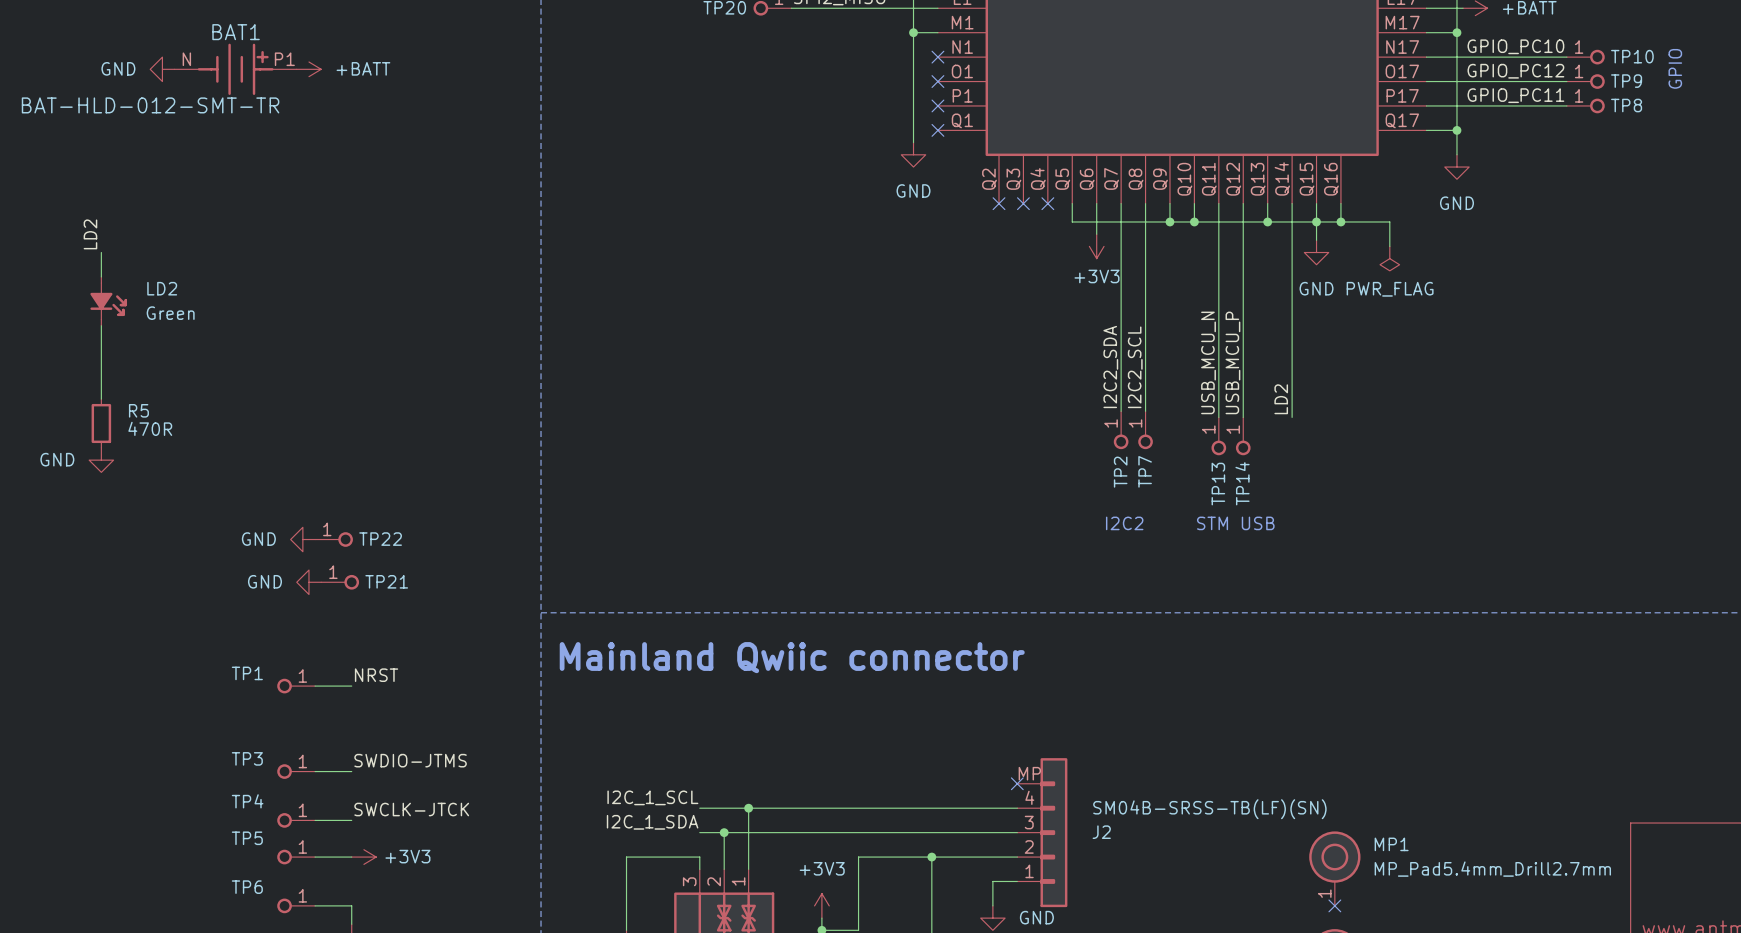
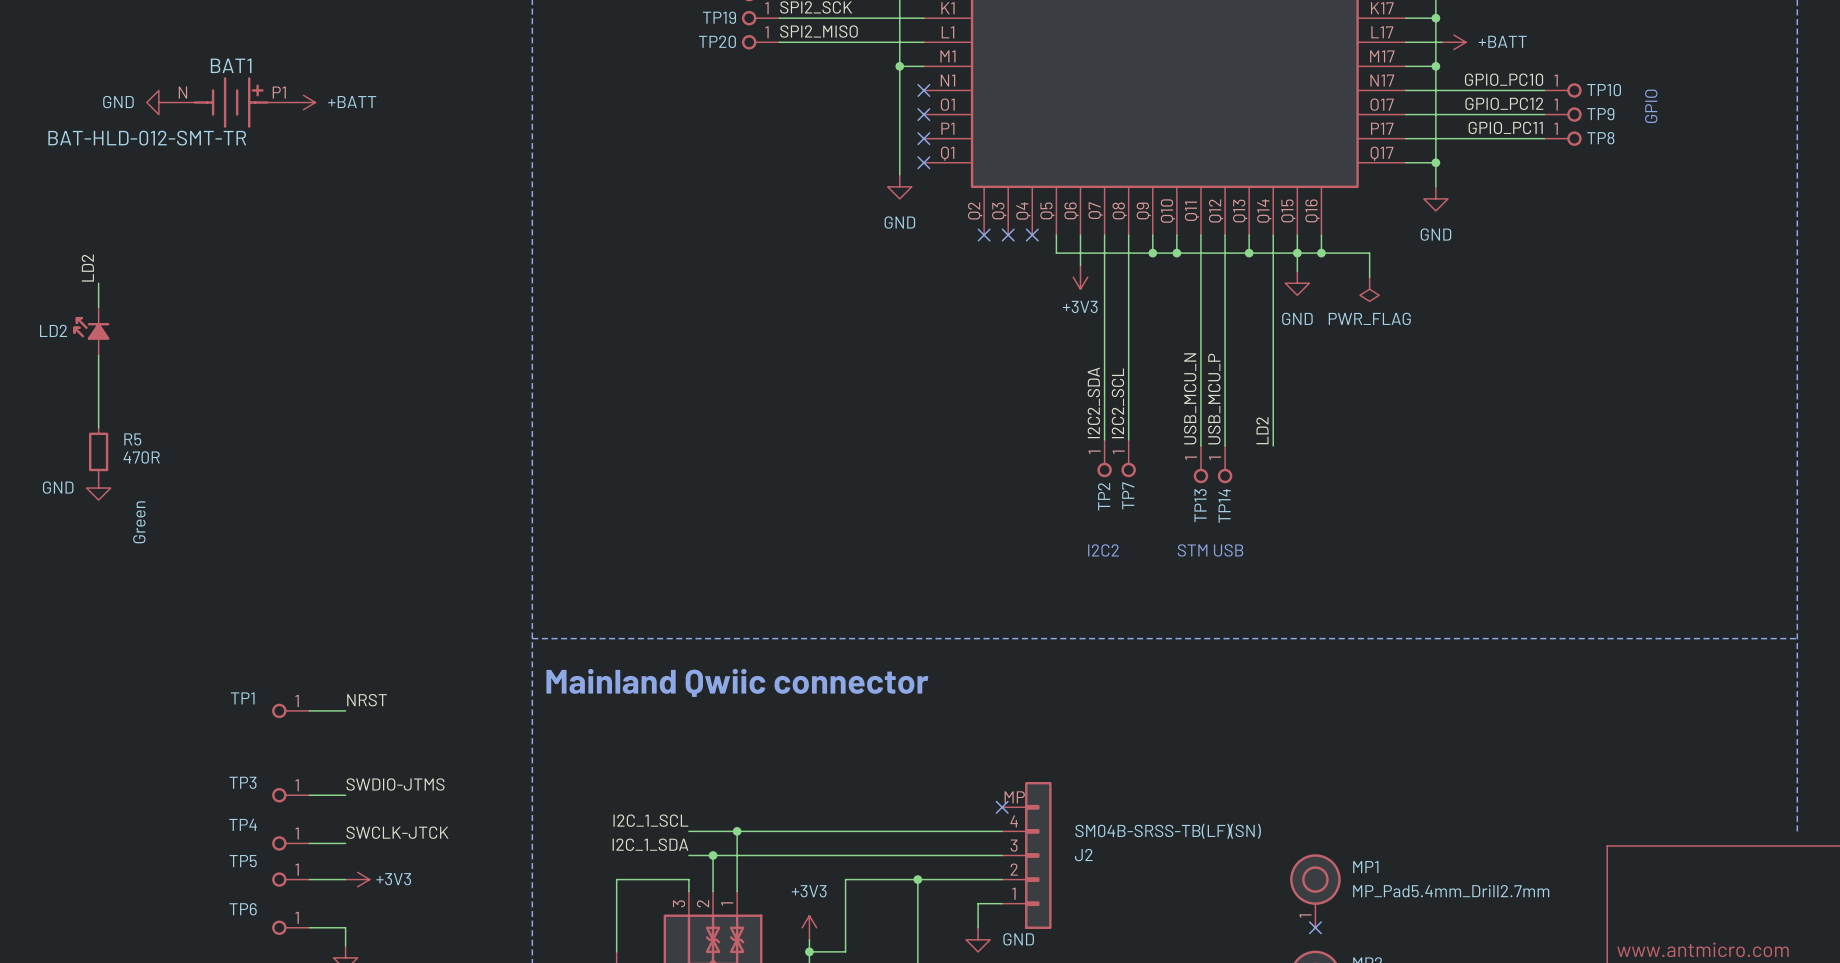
LD2 name position: LD2 (162, 288) -> LD2 (53, 330)
LD2 rotation: 0° (108, 301) -> 180° (91, 331)
LD2 text position: Green (170, 313) -> Green (139, 522)
power symbol: GND (302, 539) -> none
TP22: (334, 539) -> none
power symbol: GND (308, 582) -> none
TP21: (340, 582) -> none

